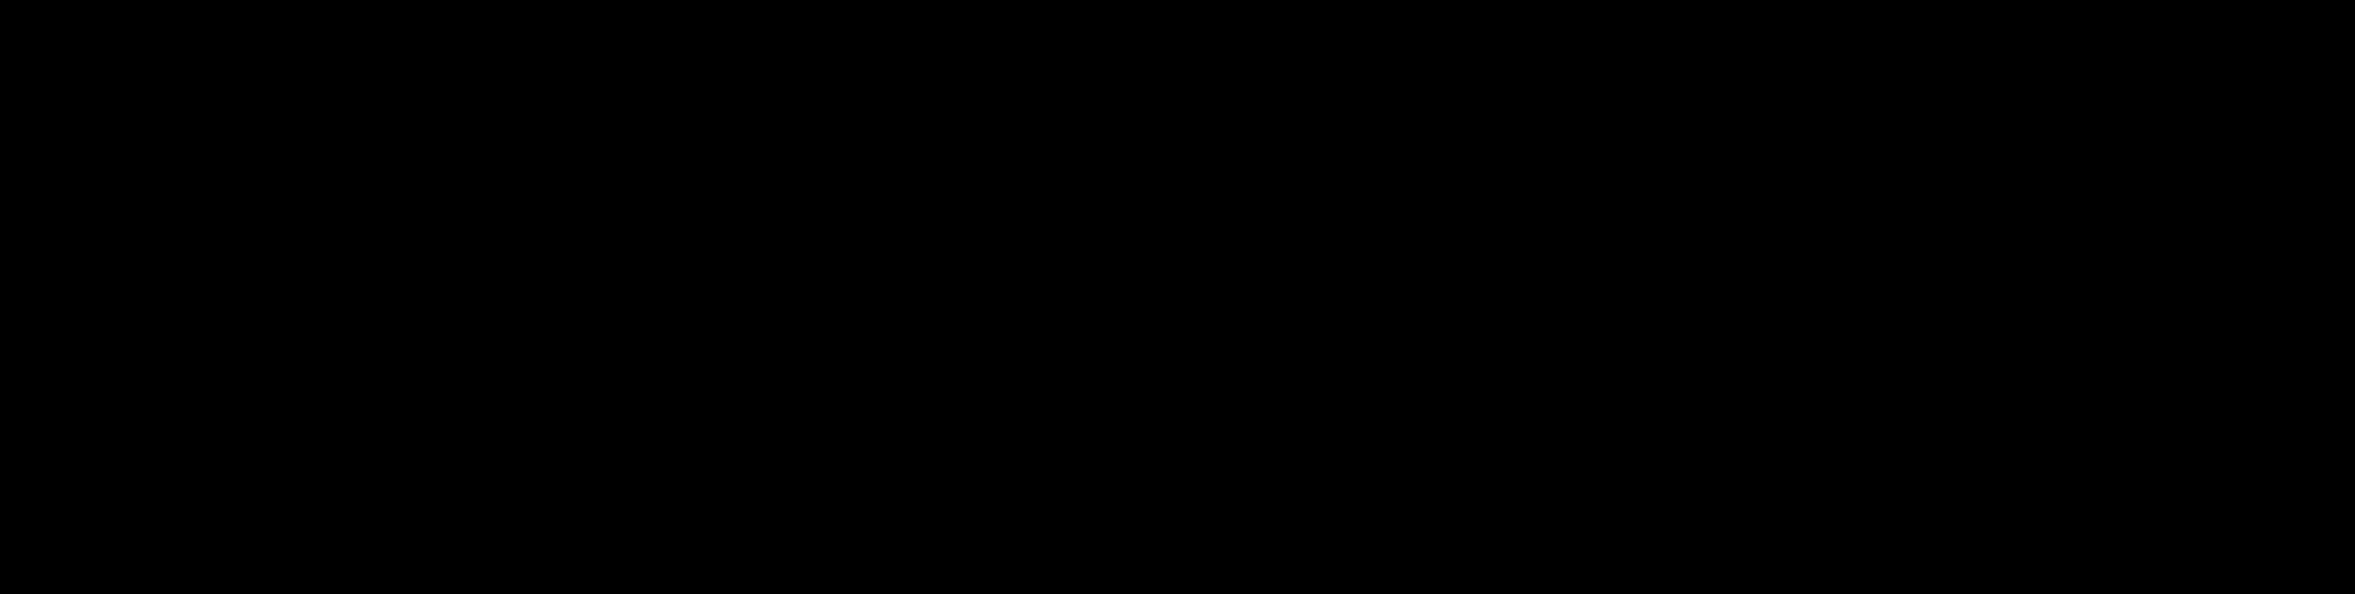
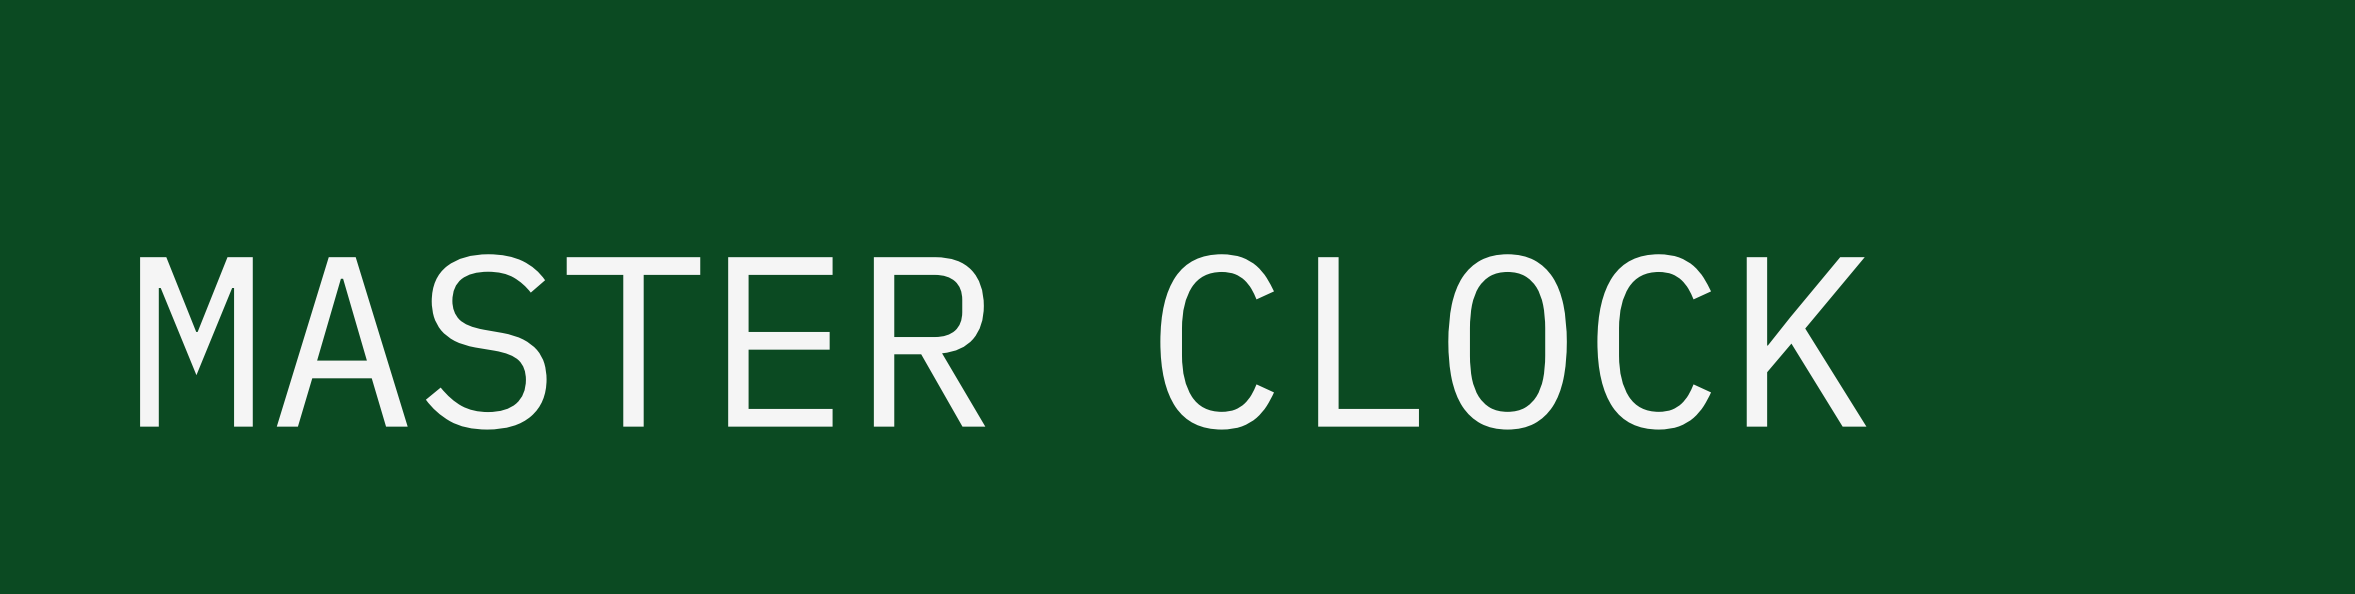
text: none -> MASTER CLOCK (1003, 341)

